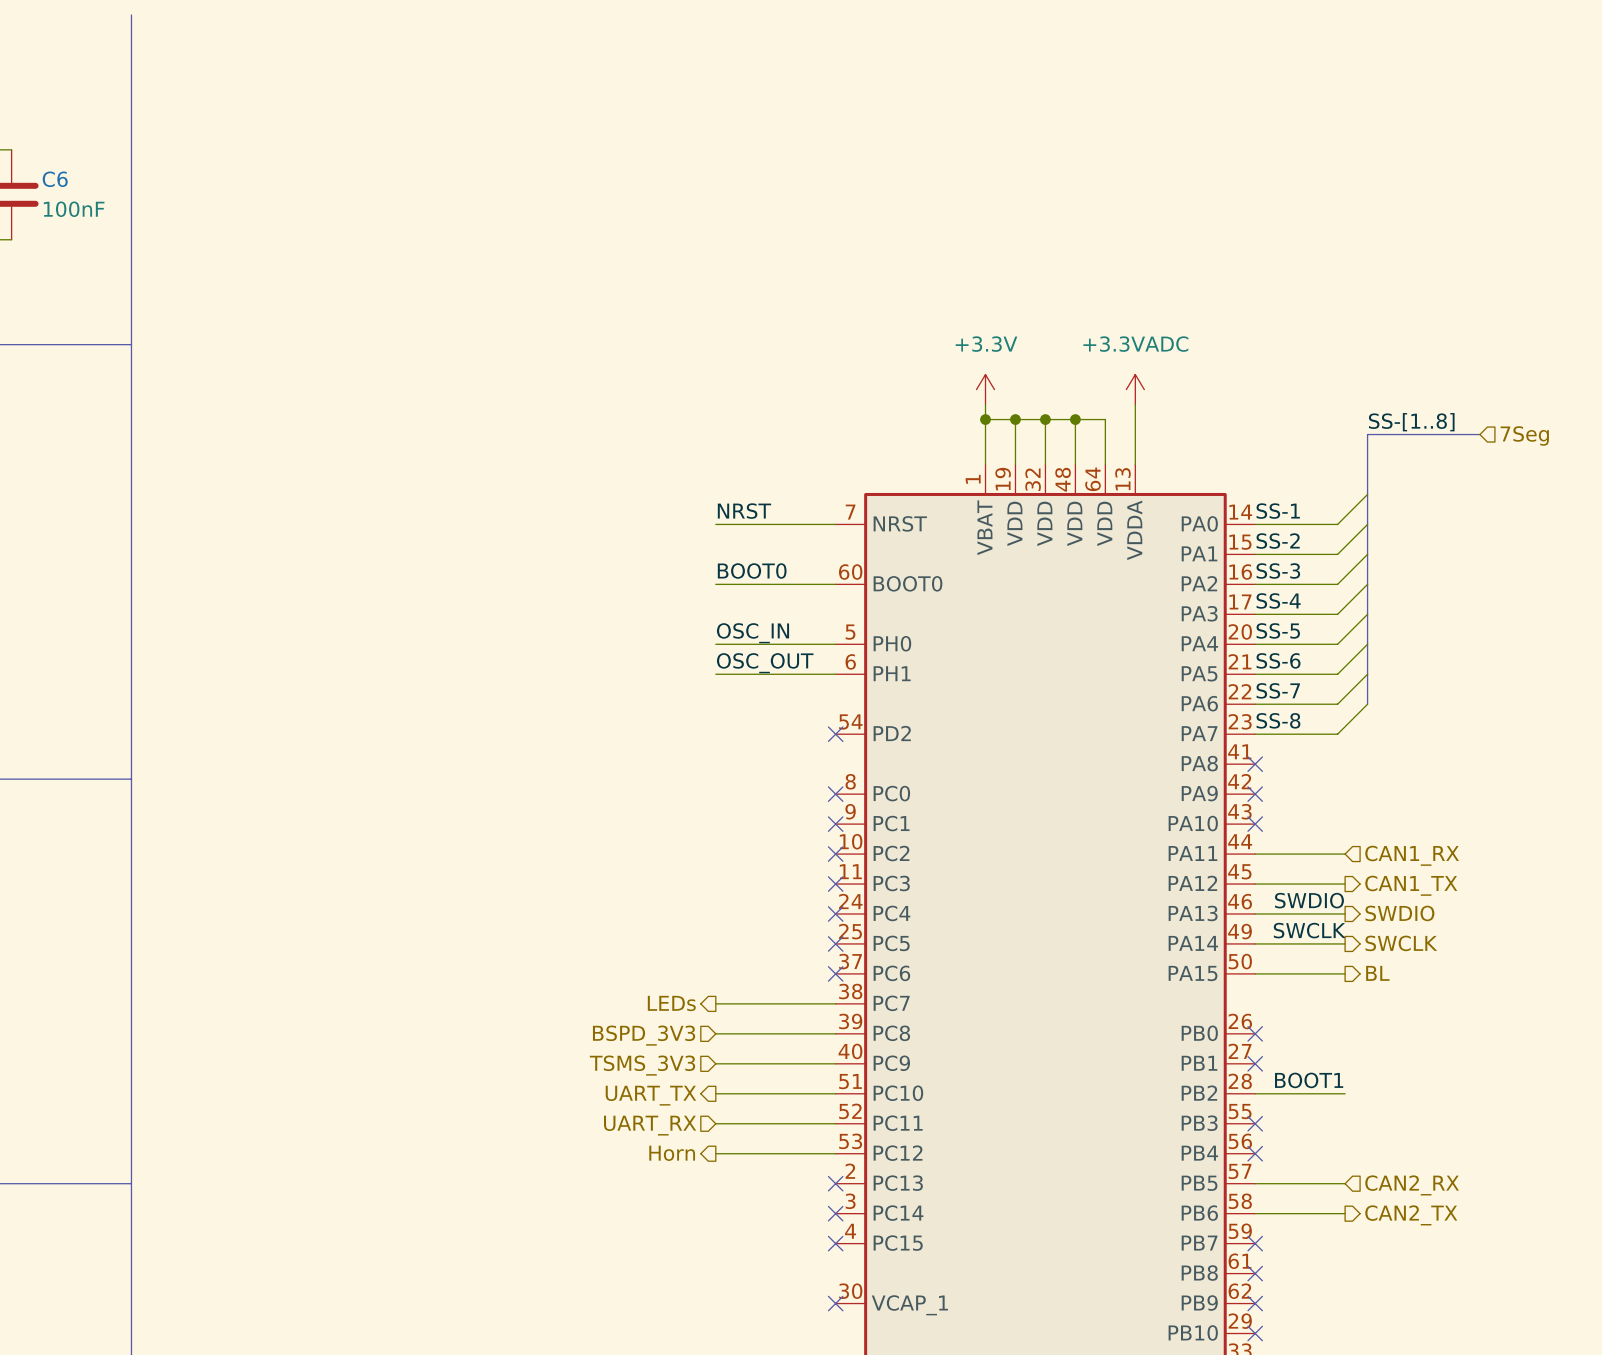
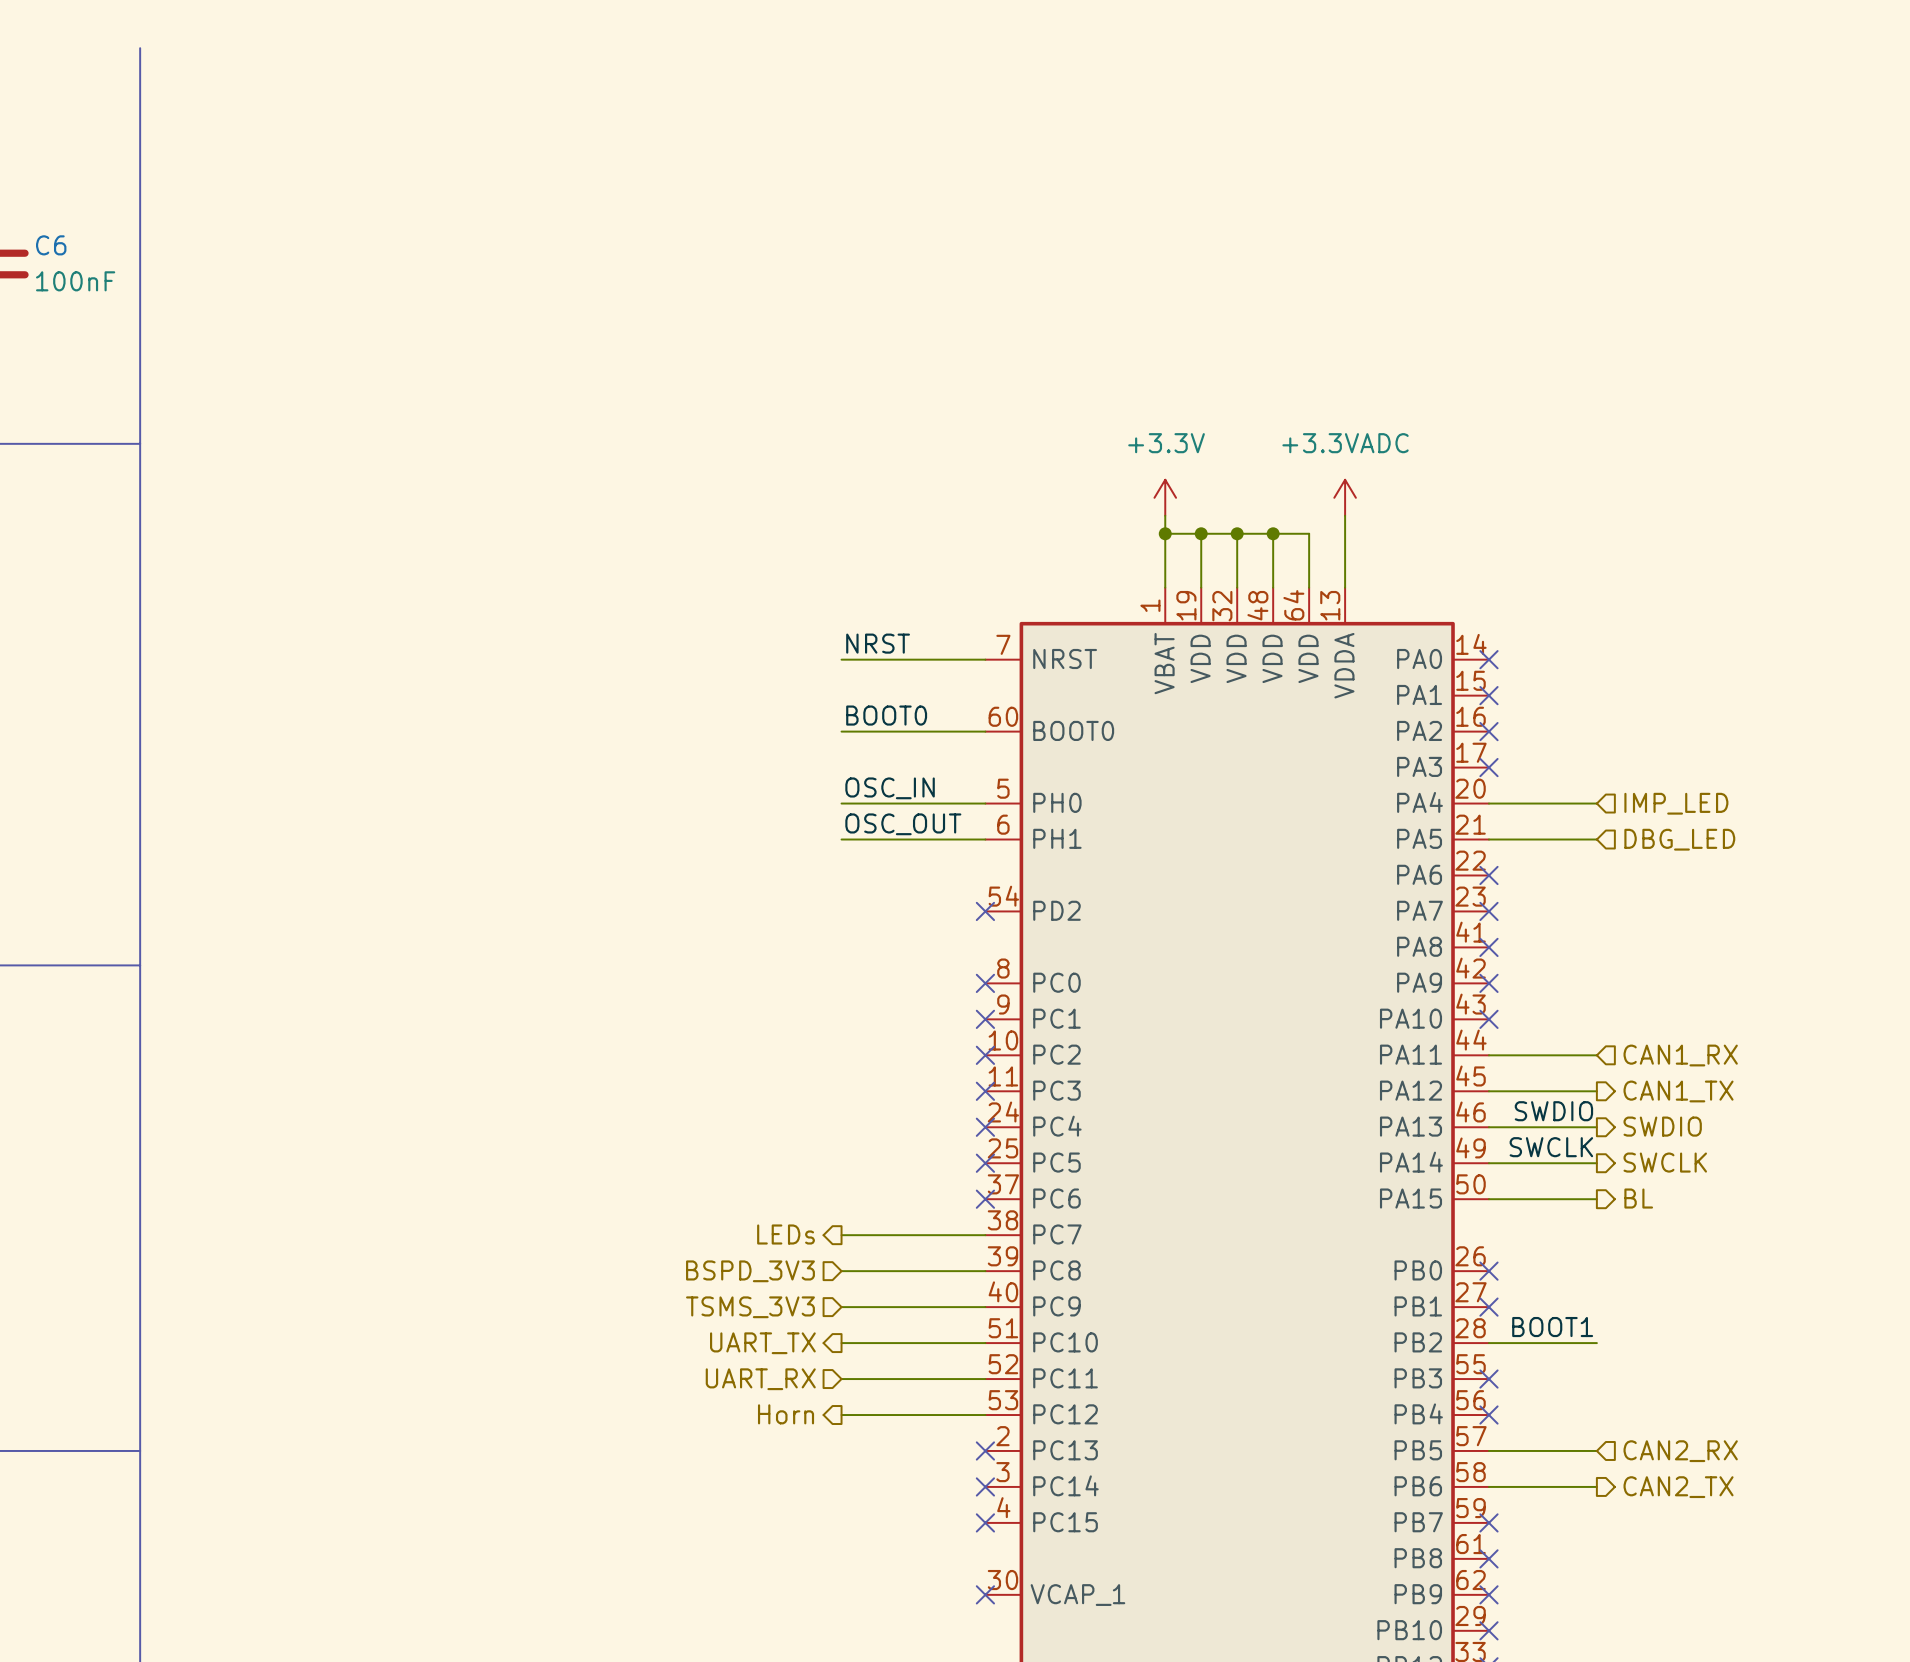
label: SS-[1..8] (1411, 422) -> none
bus: (1479, 434) (1367, 434) (1367, 704) -> none
hierarchical label: 7Seg (1524, 435) -> none
wire: (1367, 494) (1337, 524) -> none
label: SS-1 (1278, 511) -> none
wire: (1255, 524) (1337, 524) -> none
no-connect mark: none -> (1488, 659)
wire: (1367, 524) (1337, 554) -> none
label: SS-2 (1278, 541) -> none
wire: (1255, 554) (1337, 554) -> none
no-connect mark: none -> (1488, 695)
wire: (1367, 554) (1337, 584) -> none
label: SS-3 (1278, 571) -> none
wire: (1255, 584) (1337, 584) -> none
no-connect mark: none -> (1488, 731)
wire: (1367, 584) (1337, 614) -> none
label: SS-4 (1278, 600) -> none
wire: (1255, 614) (1337, 614) -> none
no-connect mark: none -> (1488, 767)
wire: (1367, 614) (1337, 644) -> (1596, 803) (1587, 803)
label: SS-5 (1278, 630) -> none
wire: (1367, 644) (1337, 674) -> (1596, 839) (1587, 839)
hierarchical label: none -> IMP_LED (1676, 803)
label: SS-6 (1278, 660) -> none
wire: (1367, 674) (1337, 704) -> none
hierarchical label: none -> DBG_LED (1679, 839)
label: SS-7 (1278, 690) -> none
wire: (1255, 704) (1337, 704) -> none
no-connect mark: none -> (1488, 875)
wire: (1367, 704) (1337, 734) -> none
label: SS-8 (1278, 720) -> none
wire: (1255, 734) (1337, 734) -> none
no-connect mark: none -> (1488, 911)

